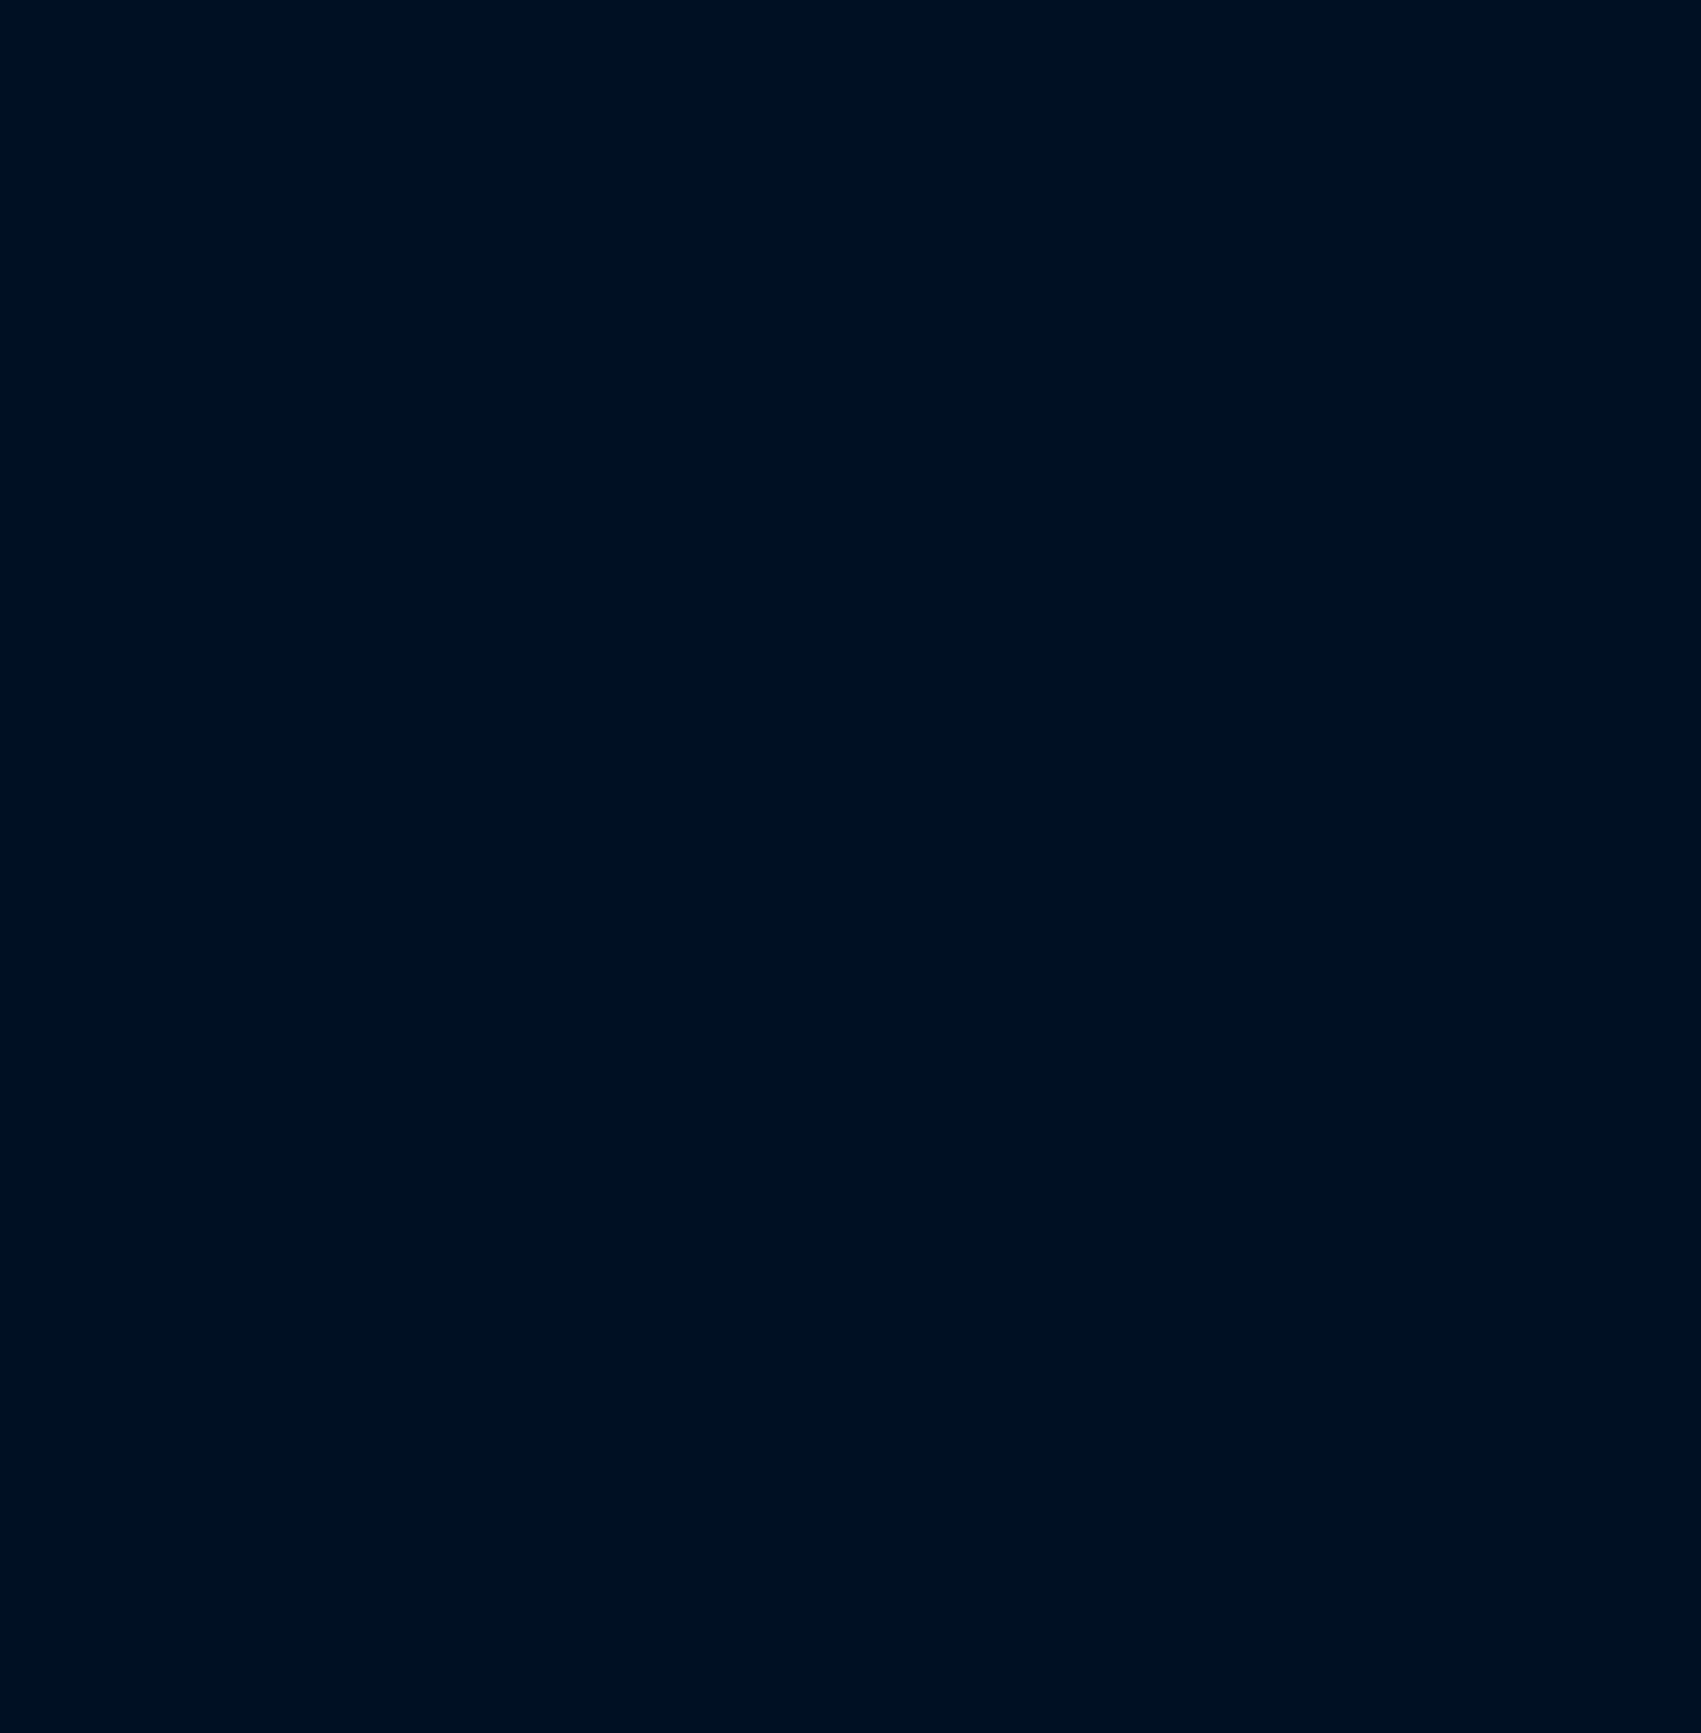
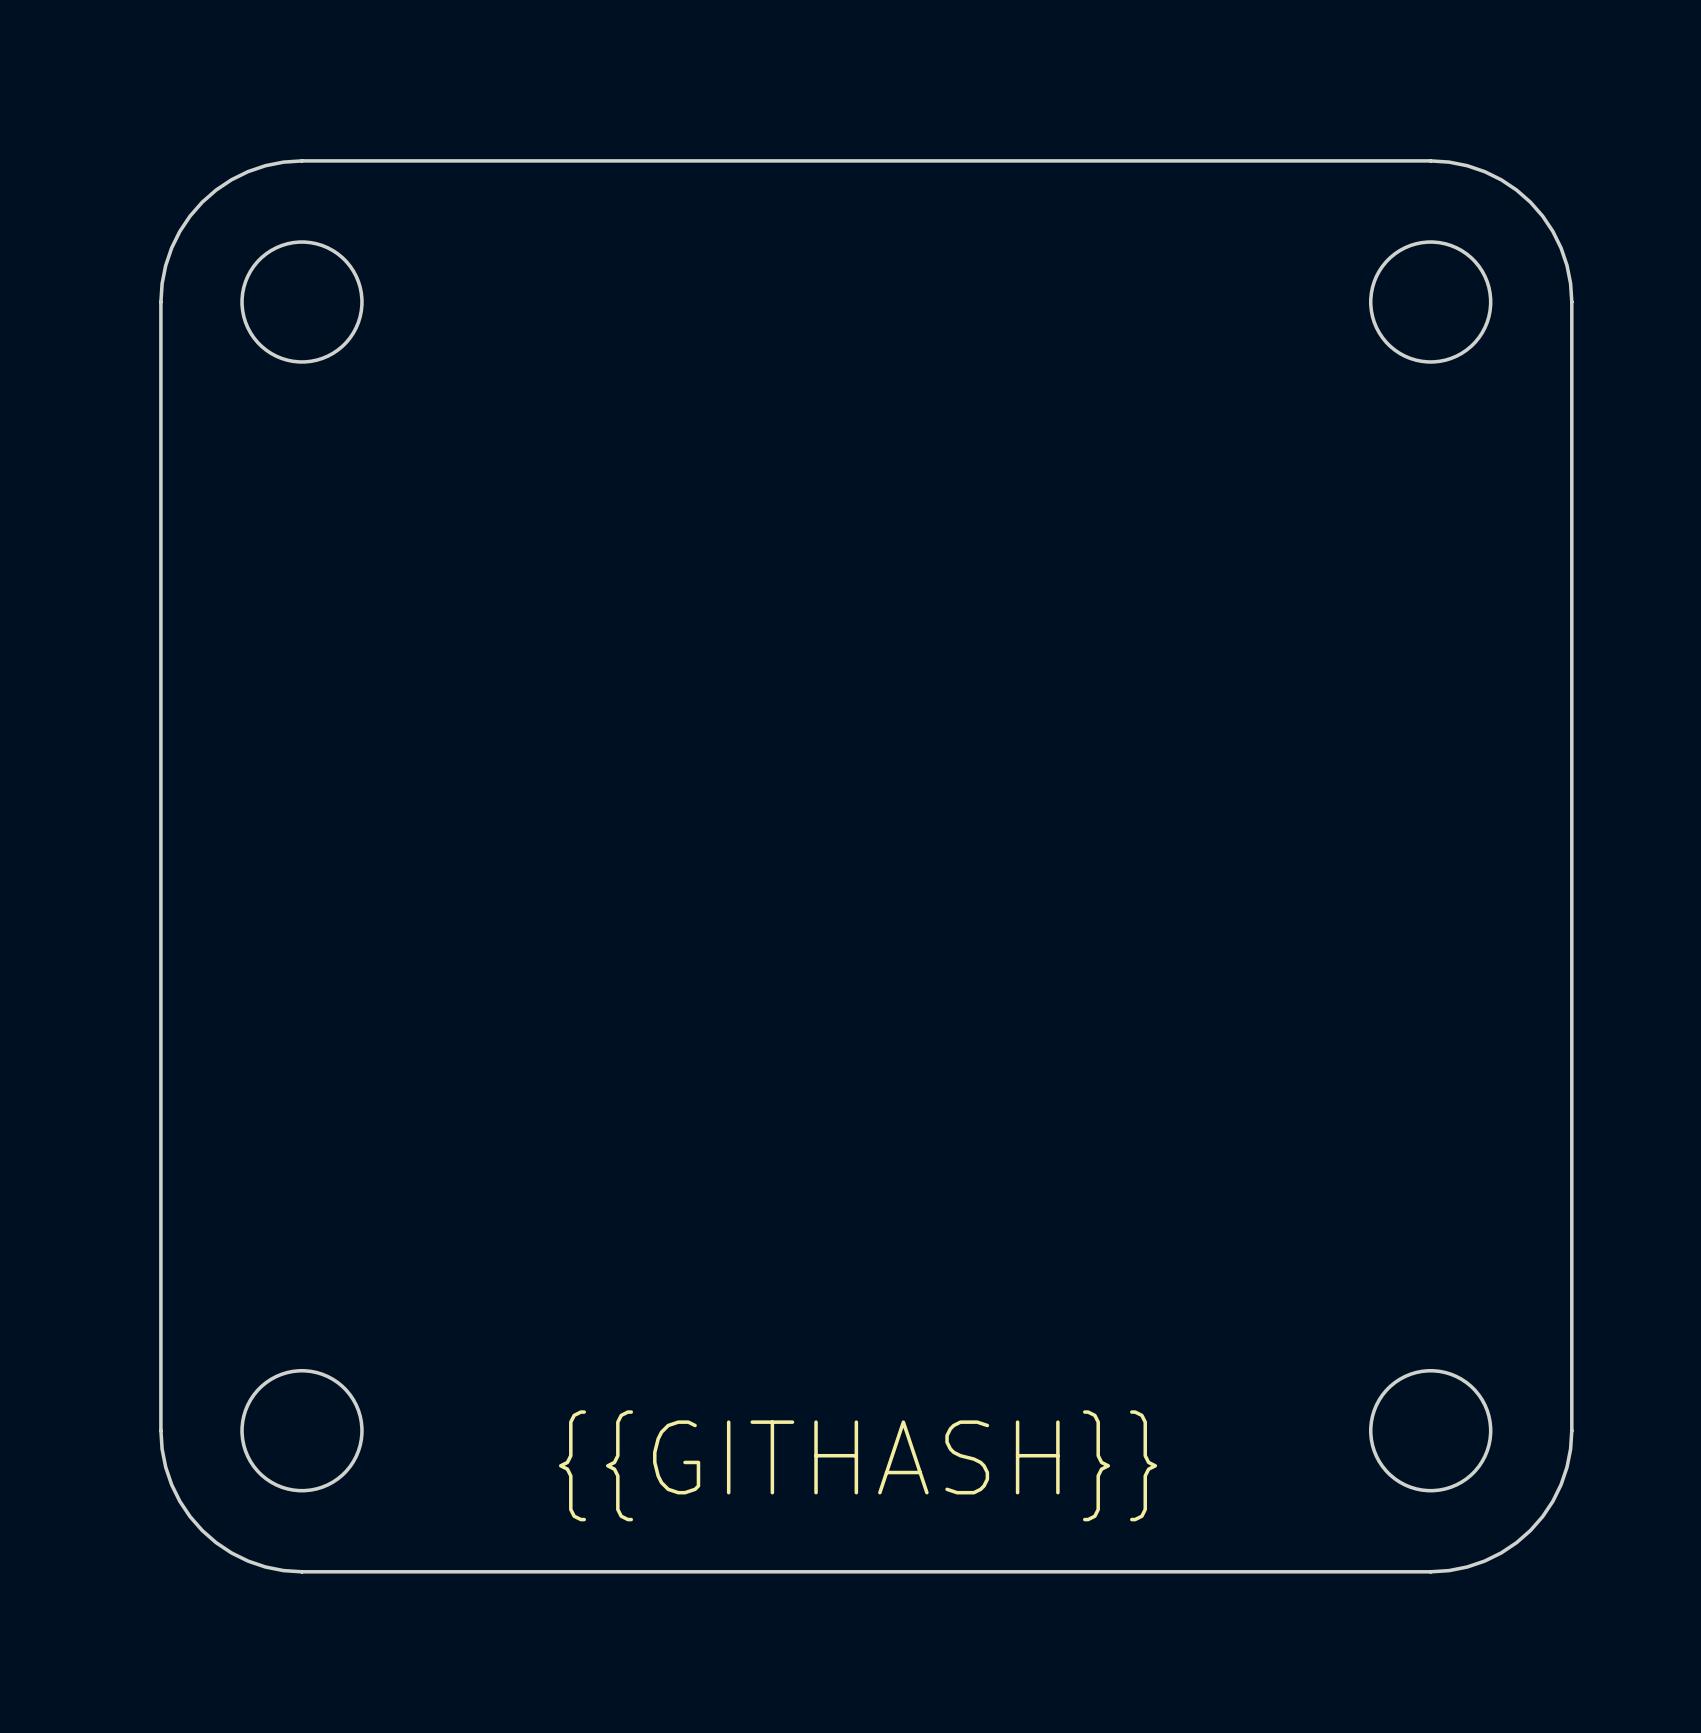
board edge: none -> (302, 160) (1430, 160) (1467, 165) (1484, 171) (1516, 190) (1530, 202) (1542, 216) (1561, 248) (1567, 265) (1571, 302) (1571, 1430) (1570, 1449) (1561, 1484) (1542, 1516) (1530, 1530) (1516, 1542) (1484, 1561) (1467, 1567) (1430, 1571) (302, 1571) (283, 1570) (248, 1561) (216, 1542) (202, 1530) (179, 1501) (171, 1484) (162, 1449) (160, 1430) (162, 283) (171, 248) (179, 231) (202, 202) (216, 190) (248, 171) (265, 165) (302, 160)
round board edge: none -> [240, 240, 364, 364]
round board edge: none -> [1368, 240, 1493, 364]
round board edge: none -> [240, 1368, 364, 1493]
round board edge: none -> [1368, 1368, 1493, 1493]
text: none -> {{GITHASH}} (858, 1465)

